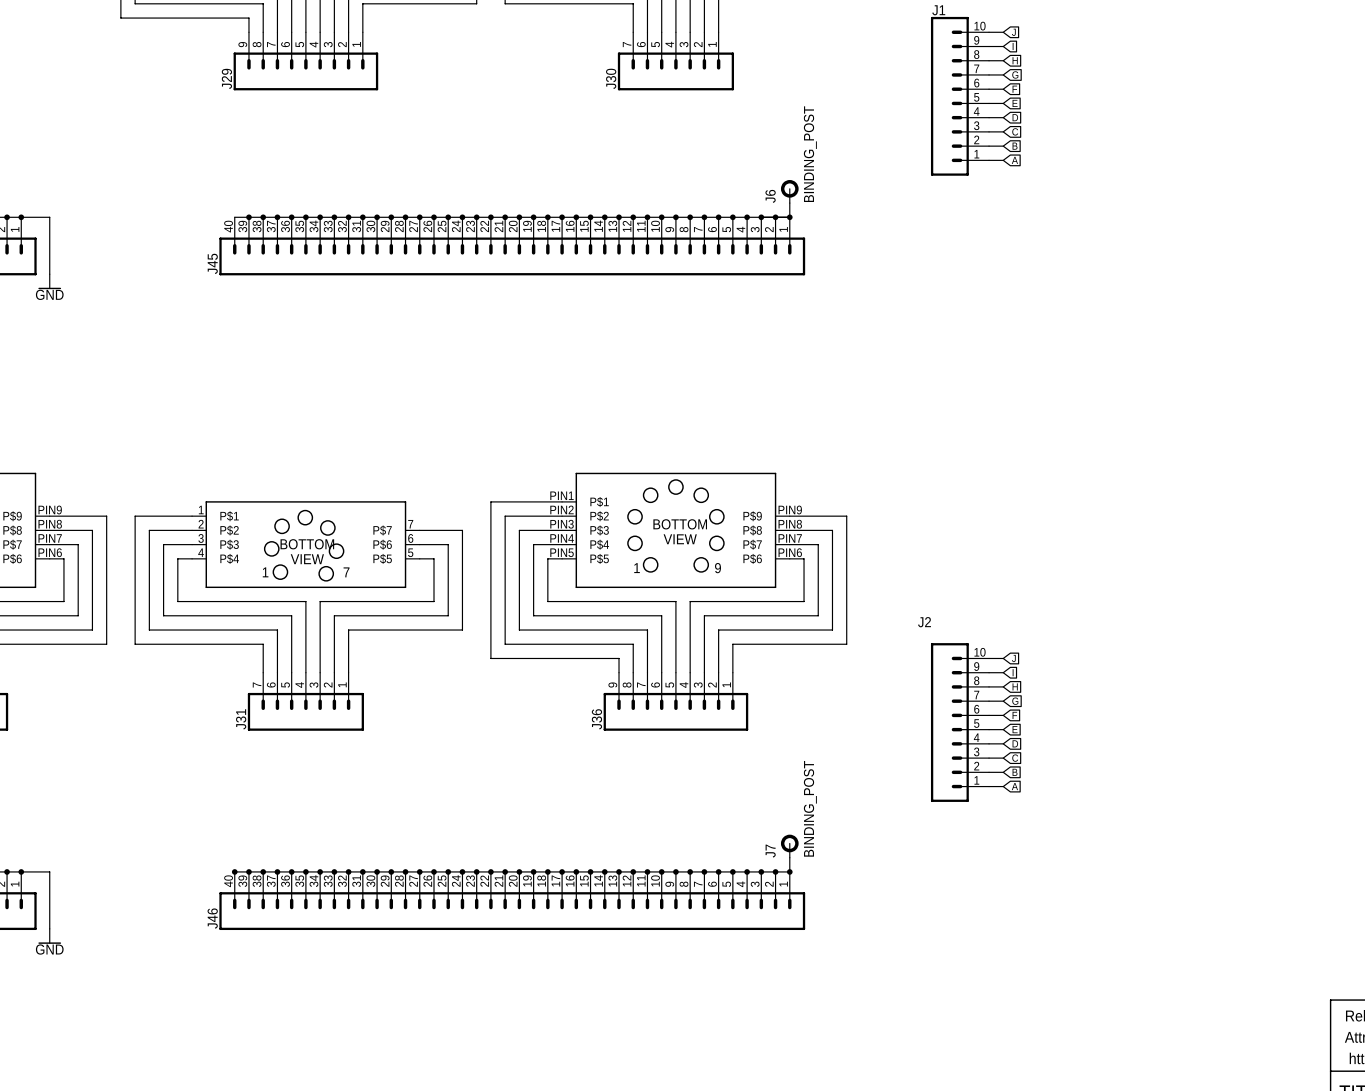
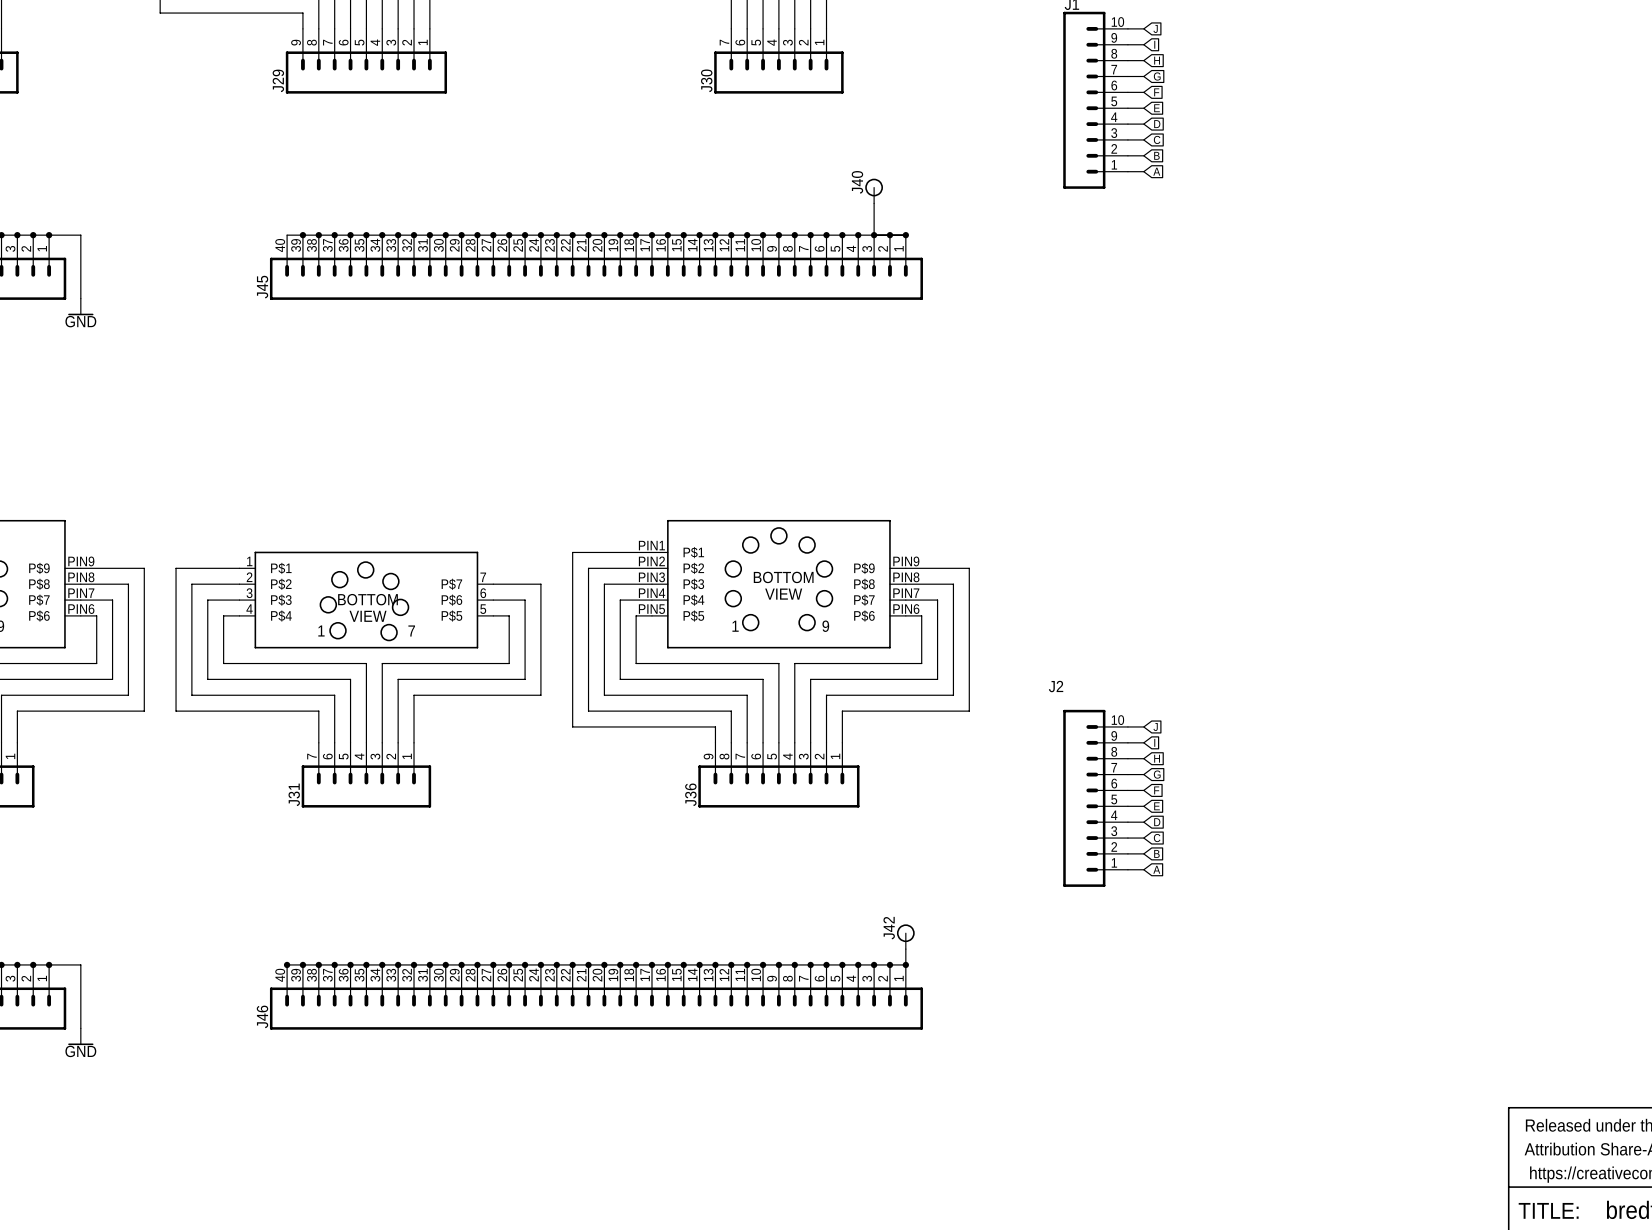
J40: none -> (874, 191)
wire: none -> (874, 203) (874, 235)
J6: BINDING_POST (789, 191) -> none
wire: (789, 203) (789, 217) -> none
J7: BINDING_POST (789, 846) -> none
J42: none -> (905, 936)

